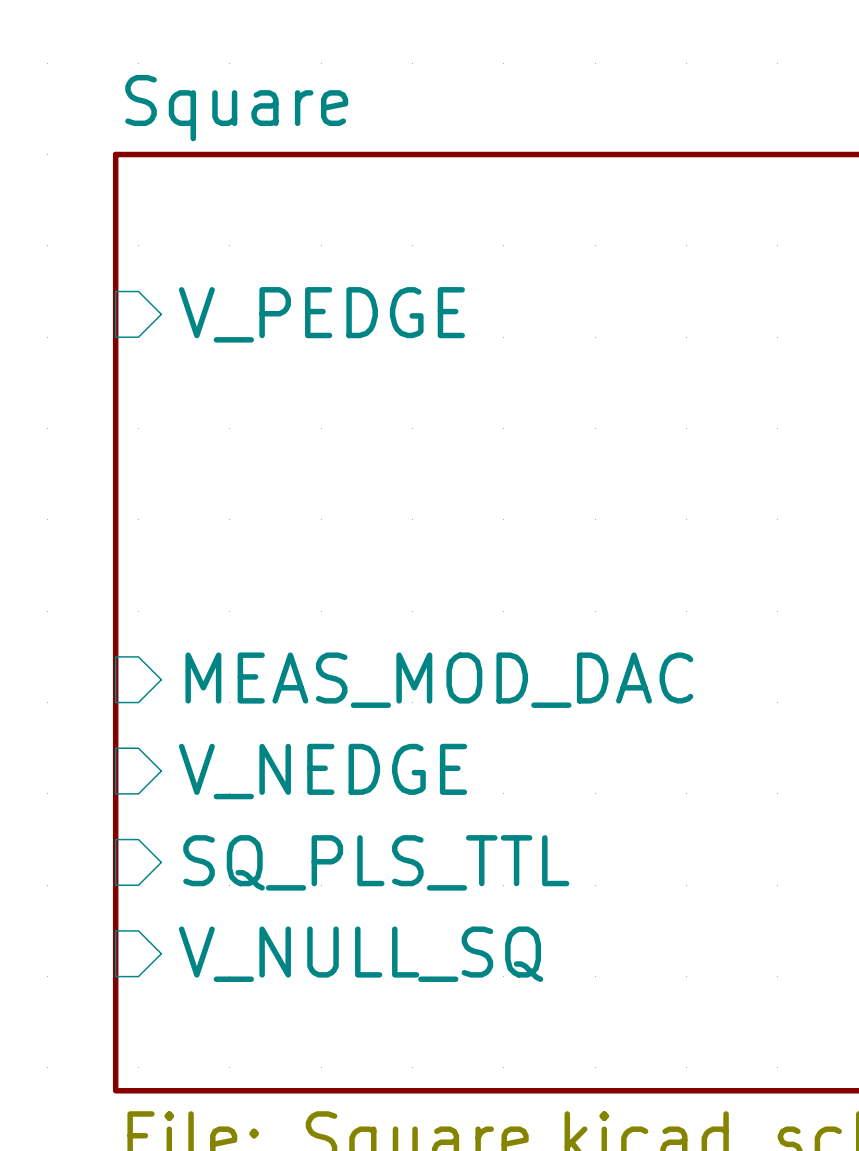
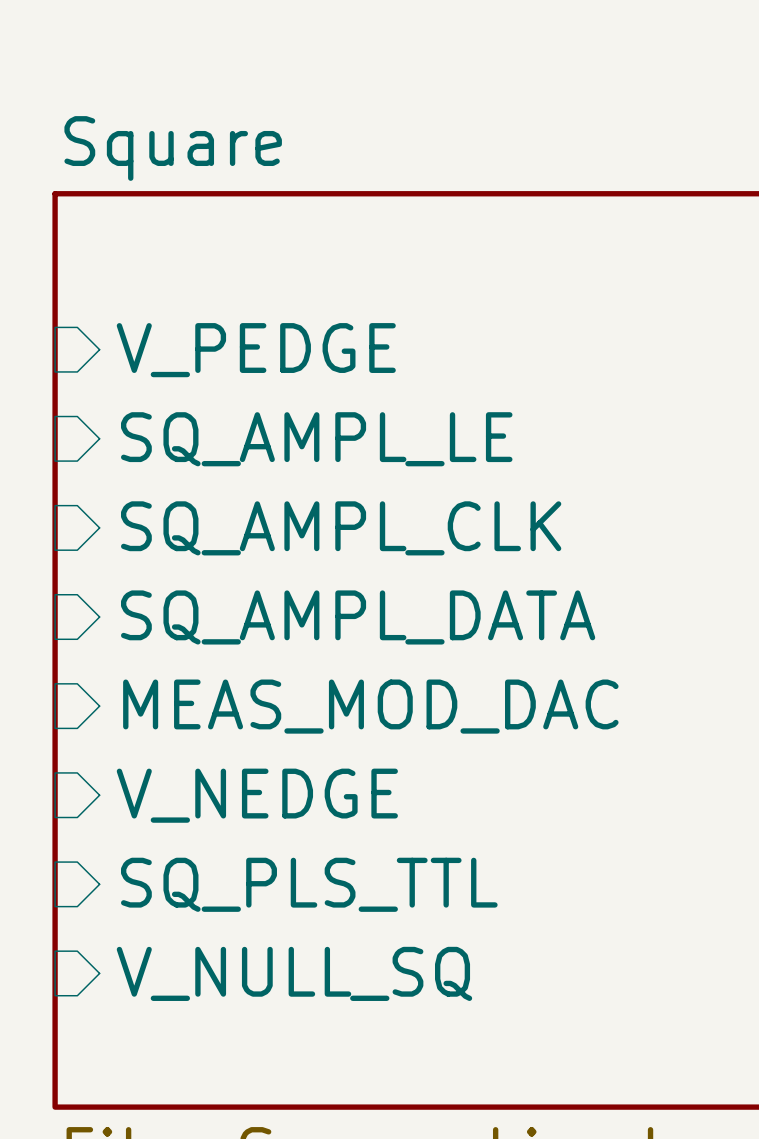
sheet pin: none -> SQ_AMPL_LE (316, 439)
sheet pin: none -> SQ_AMPL_CLK (341, 528)
sheet pin: none -> SQ_AMPL_DATA (358, 617)

